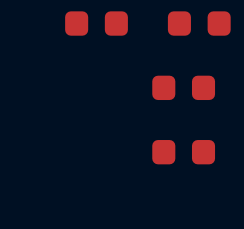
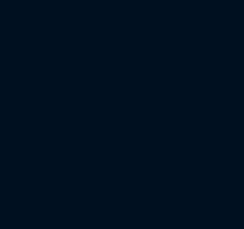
part: (96, 23) -> none
part: (199, 23) -> none
part: (183, 87) -> none
part: (183, 152) -> none

